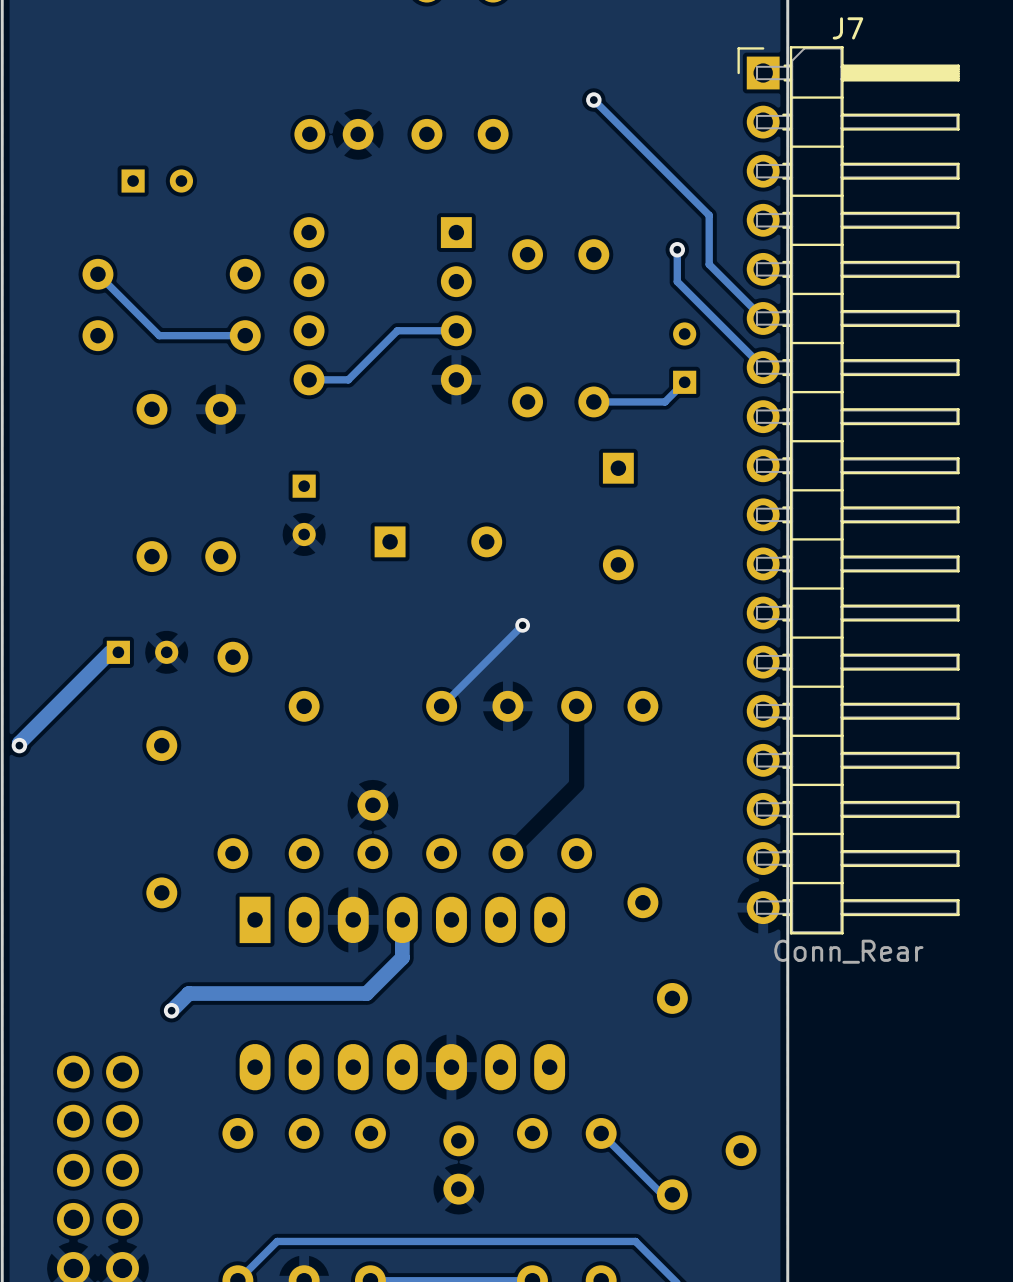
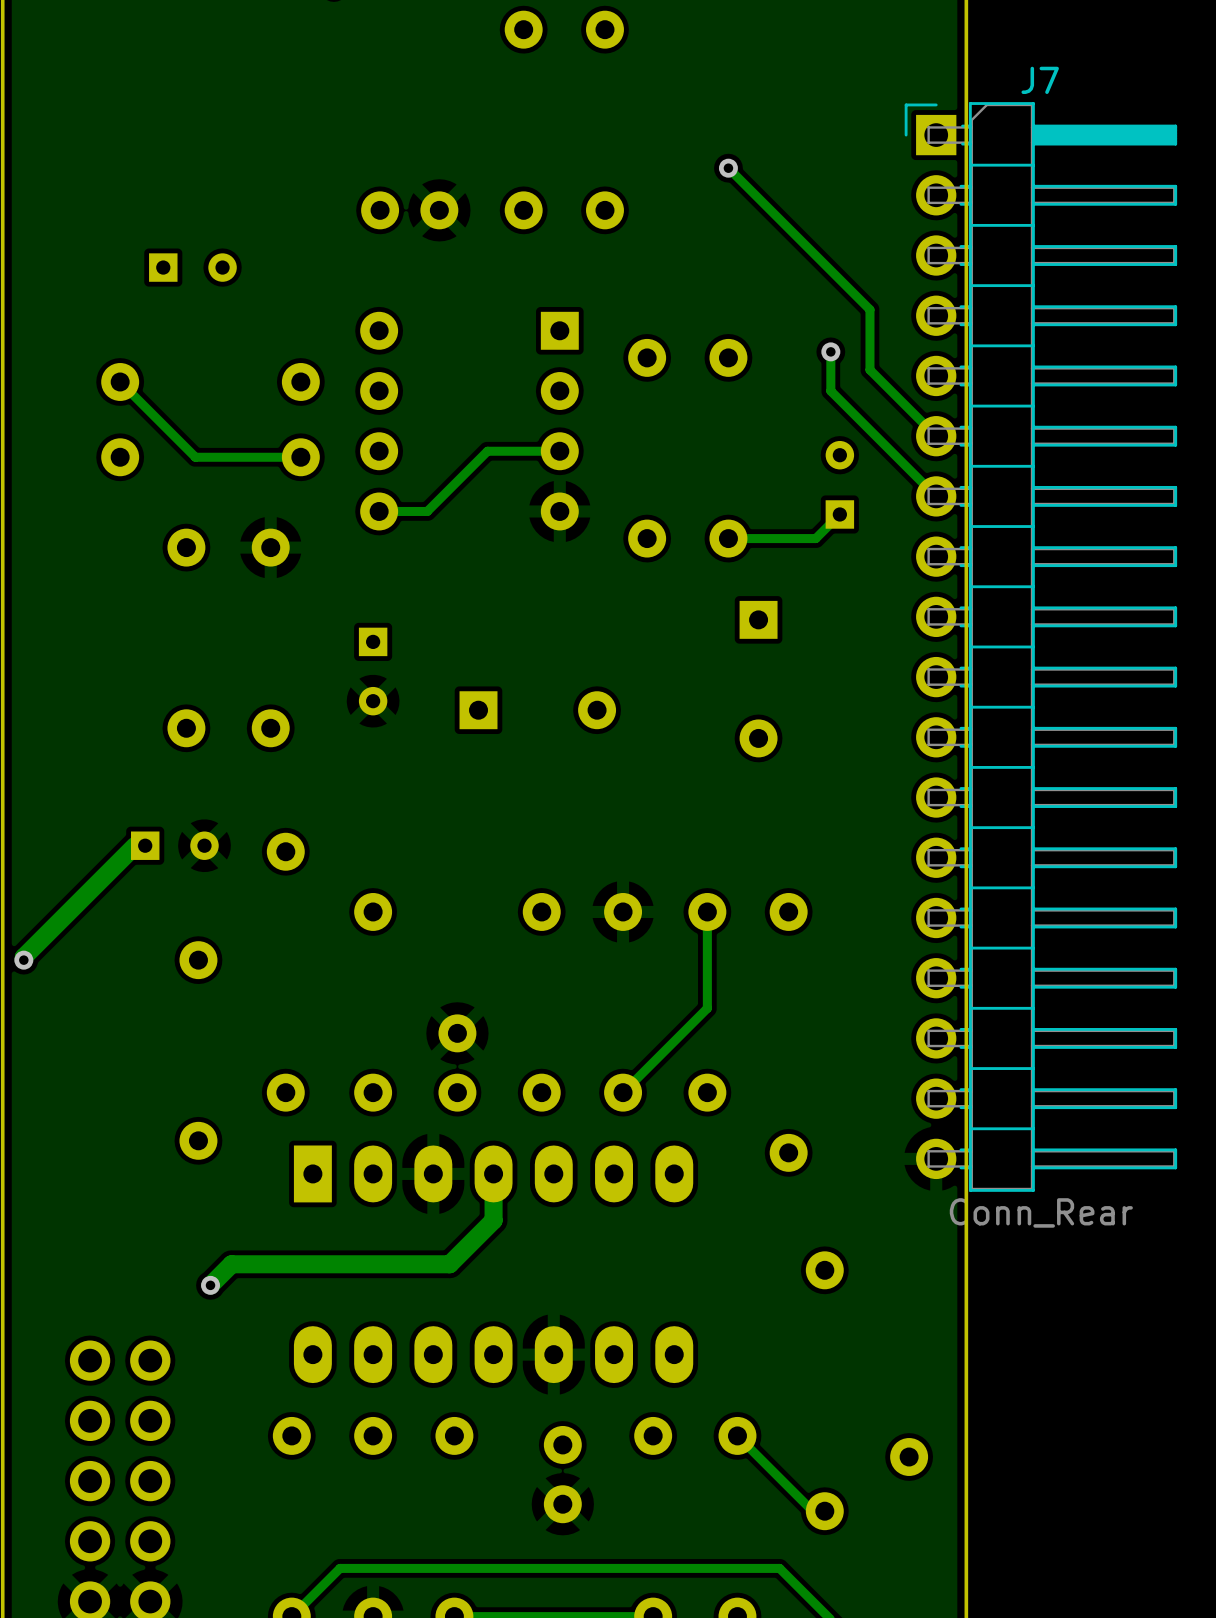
track: (522, 625) (441, 706) -> none
via: (522, 625) -> none
track: none -> (707, 911) (707, 1008) (623, 1092)

